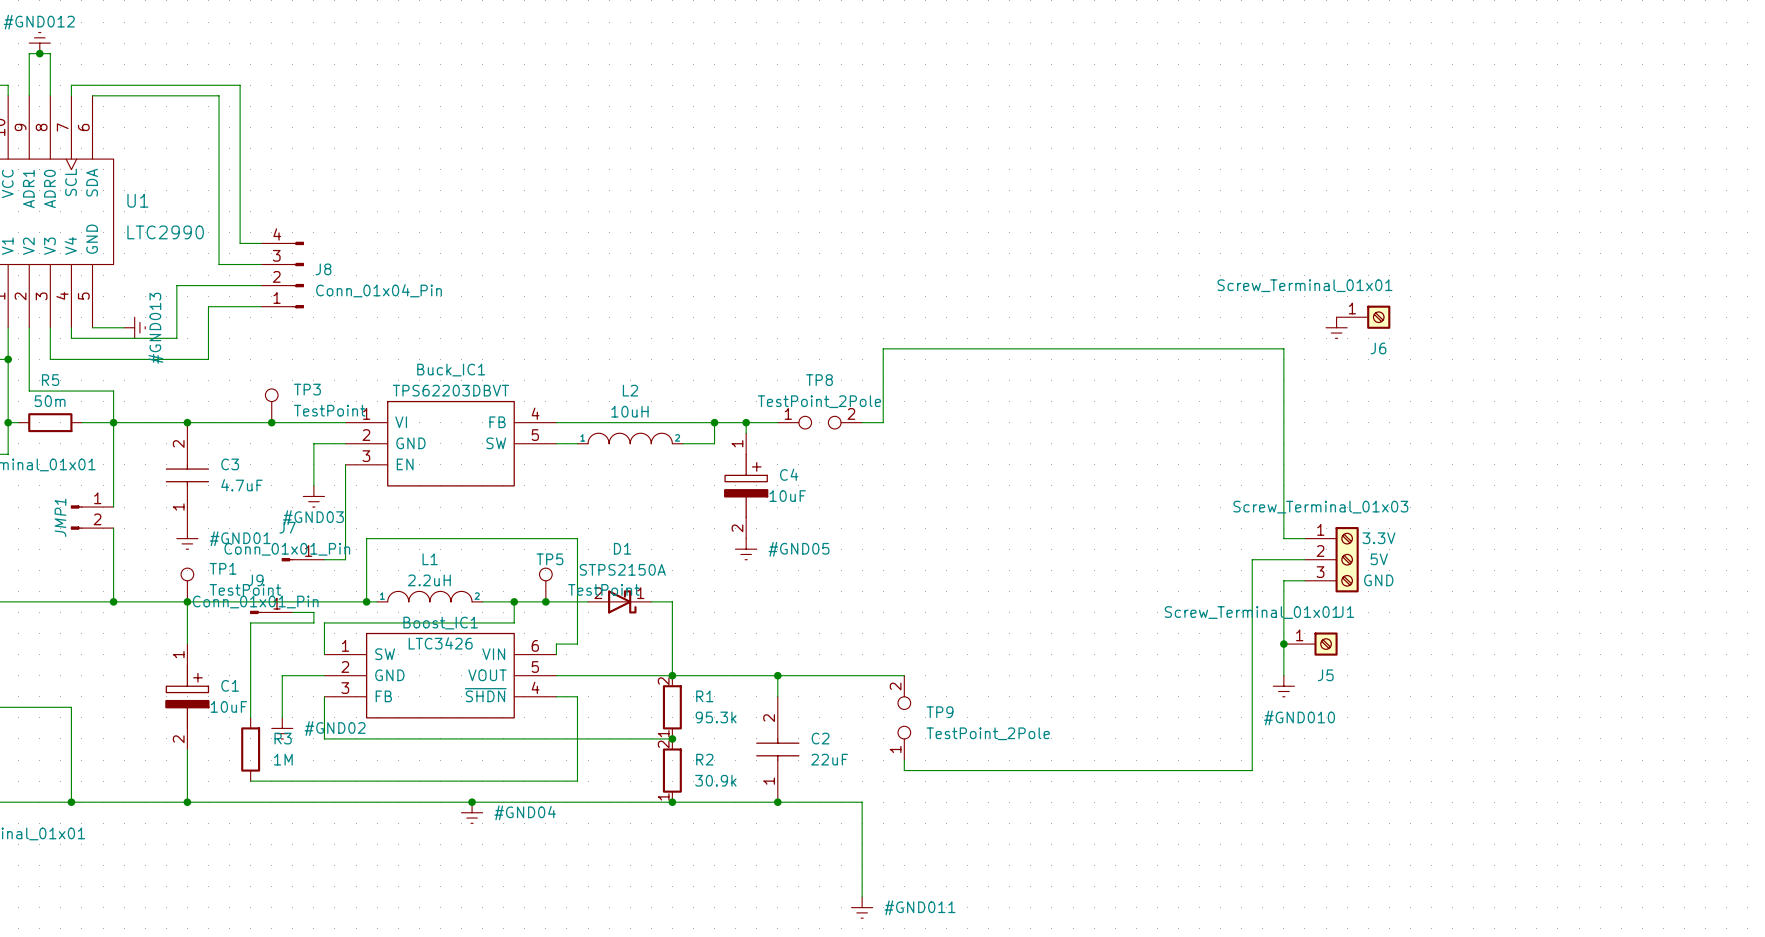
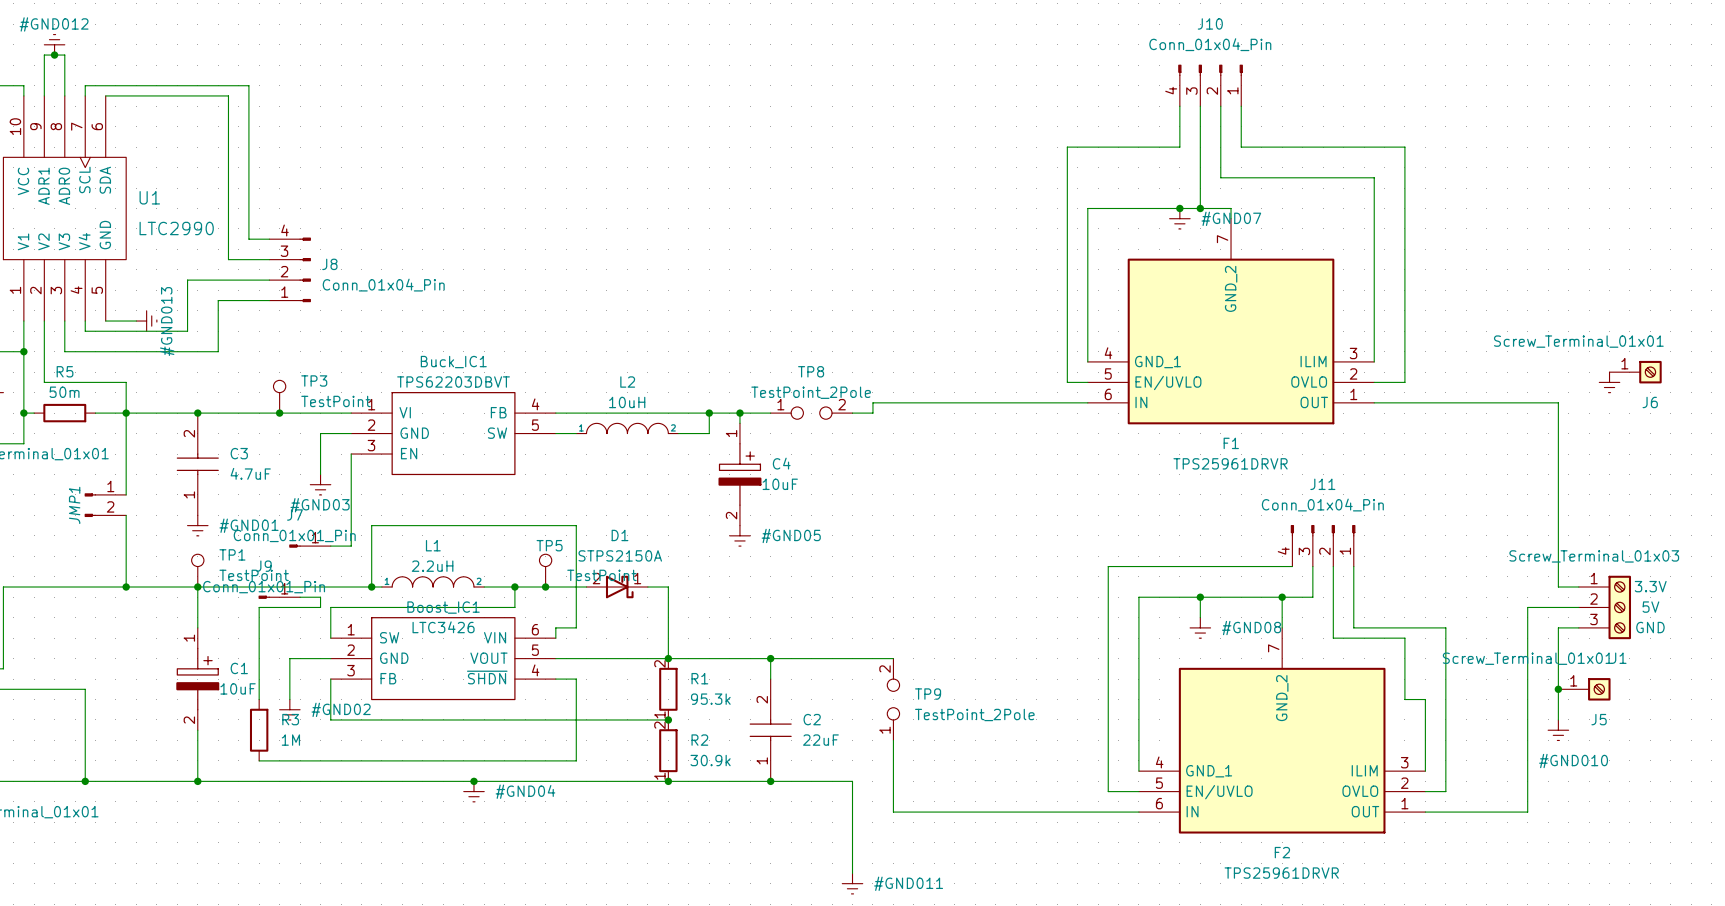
J10: none -> Conn_01x04_Pin (1210, 85)
wire: none -> (1179, 106) (1179, 147) (1067, 147) (1067, 382) (1087, 382)
wire: none -> (1200, 106) (1200, 208)
wire: none -> (1220, 106) (1220, 177) (1374, 177) (1374, 361)
wire: none -> (1241, 106) (1241, 147) (1404, 147) (1404, 382) (1374, 382)
junction: none -> (1179, 208)
junction: none -> (1200, 208)
#GND07: none -> (1179, 218)
wire: none -> (1231, 218) (1231, 208) (1087, 208) (1087, 361)
J6 position: (1363, 317) -> (1635, 372)
power symbol: (1336, 327) -> none
F1: none -> TPS25961DRVR (1231, 321)
power symbol: none -> (1609, 382)
wire: (883, 412) (883, 348) (1283, 348) (1283, 538) (1304, 538) -> (872, 402) (1087, 402)
wire: none -> (1374, 402) (1558, 402) (1558, 587) (1578, 587)
wire: (1304, 559) (1252, 559) (1252, 770) (904, 770) -> (1138, 812) (893, 812) (893, 750)
J1 position: (1331, 559) -> (1604, 607)
J11: none -> Conn_01x04_Pin (1323, 545)
wire: (1283, 580) (1283, 675) -> (1261, 566) (1108, 566) (1108, 791) (1138, 791)
wire: none -> (1312, 566) (1312, 597) (1138, 597) (1138, 771)
wire: none -> (1333, 566) (1333, 638) (1404, 638) (1404, 699) (1425, 699) (1425, 771)
wire: none -> (1353, 566) (1353, 627) (1445, 627) (1445, 791) (1425, 791)
wire: none -> (1200, 597) (1200, 617)
junction: none -> (1200, 597)
wire: none -> (1282, 597) (1282, 627)
junction: none -> (1282, 597)
wire: none -> (1578, 607) (1527, 607) (1527, 812) (1425, 812)
#GND08: none -> (1200, 627)
junction: (1283, 644) -> none
J5 position: (1310, 644) -> (1584, 689)
wire: none -> (1578, 627) (1558, 627) (1558, 719)
#GND010 position: (1283, 686) -> (1558, 730)
junction: none -> (1558, 689)
F2: none -> TPS25961DRVR (1282, 730)

